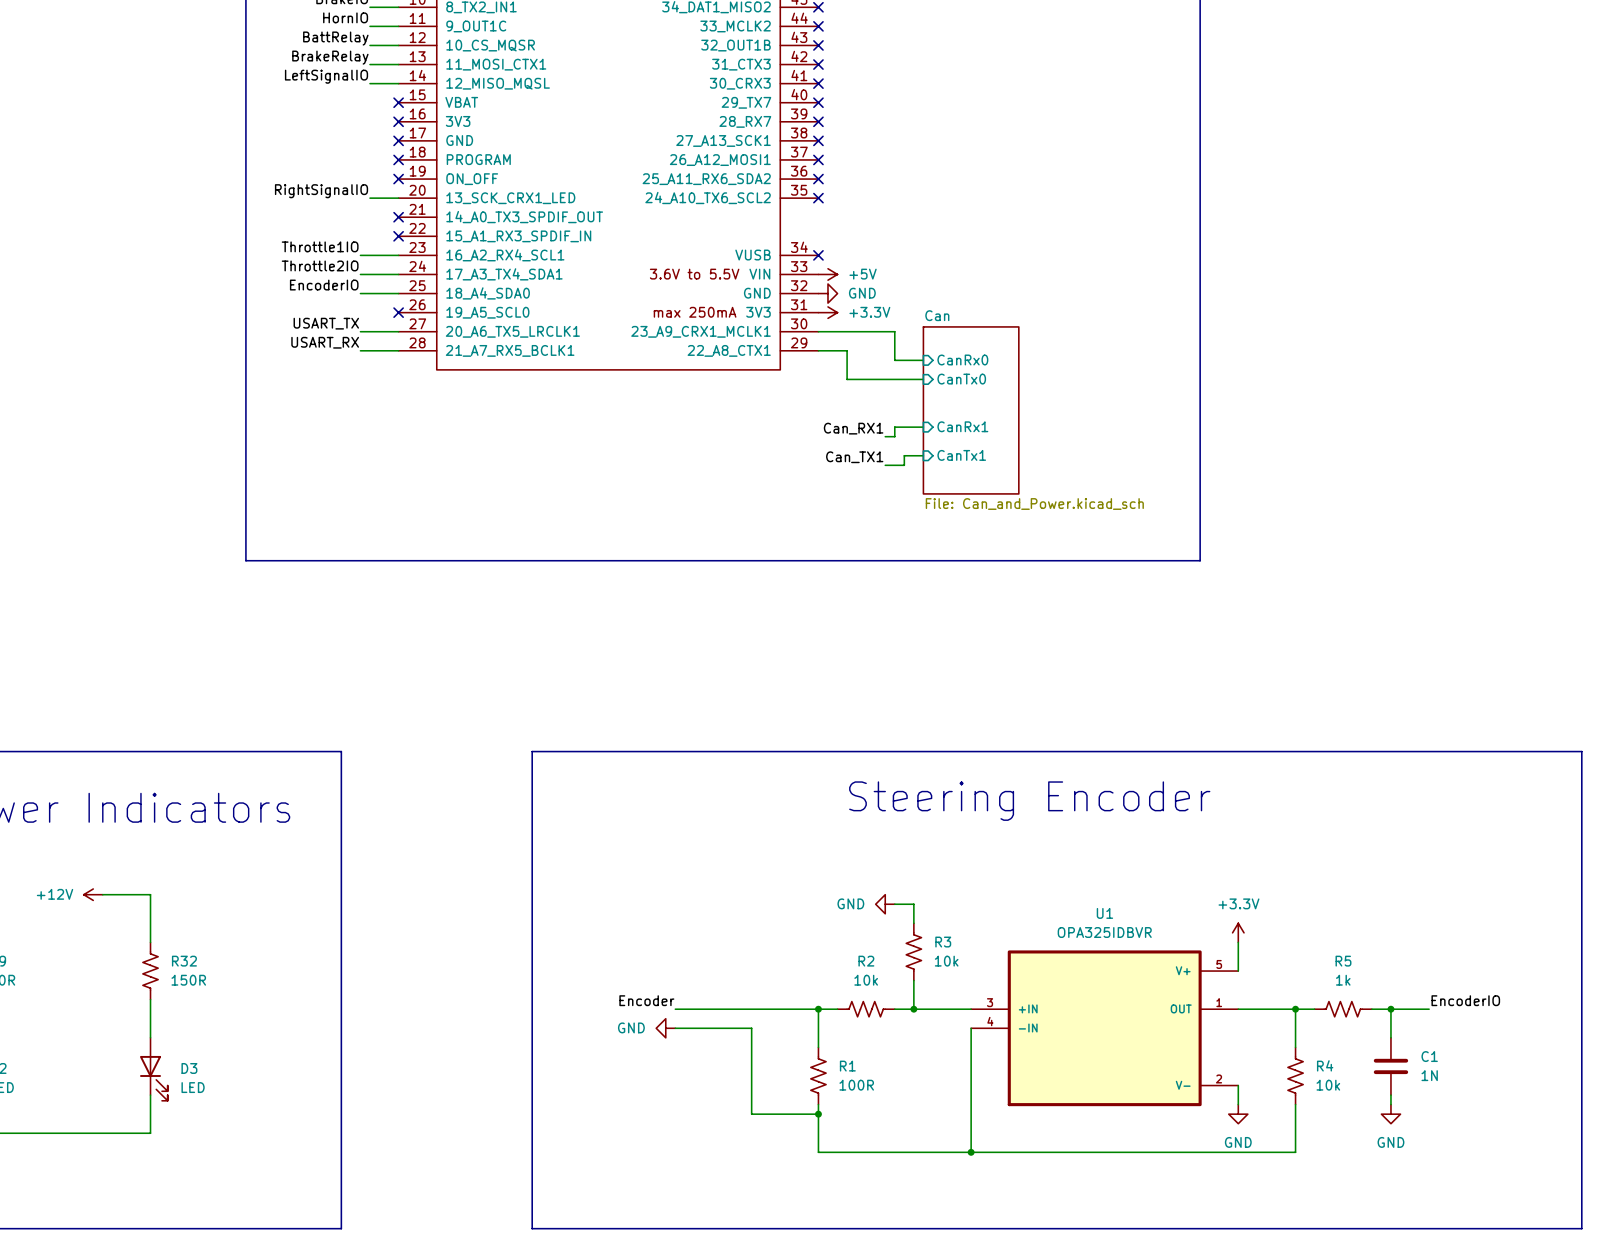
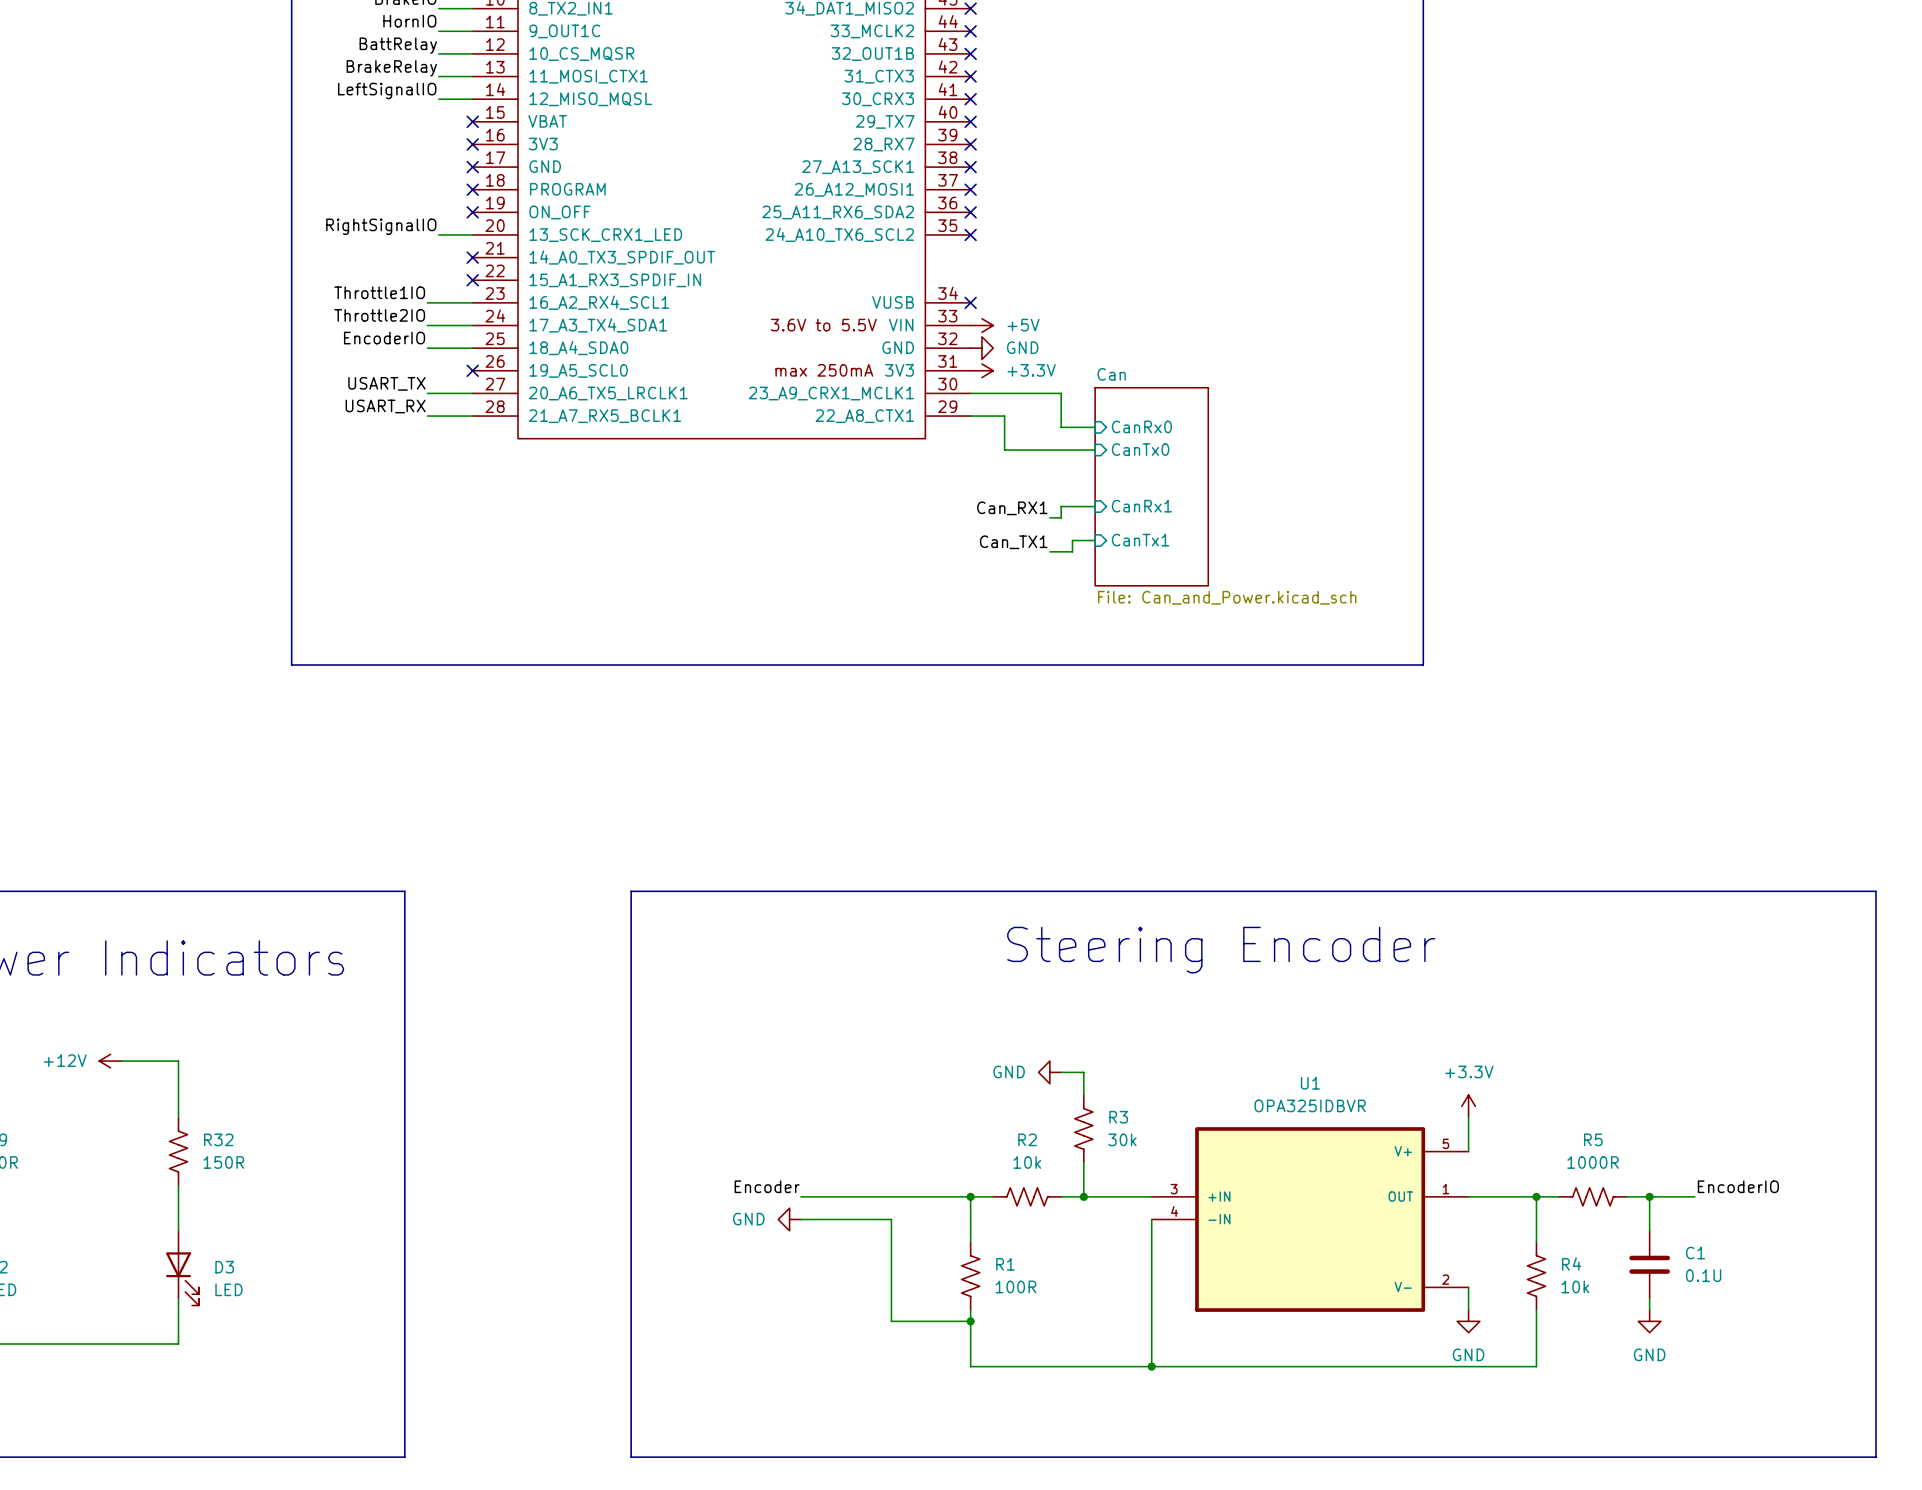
R3 value: 10k (946, 961) -> 30k (1122, 1139)
R5 value: 1k (1343, 980) -> 1000R (1593, 1162)
C1 value: 1N (1429, 1075) -> 0.1U (1703, 1275)

